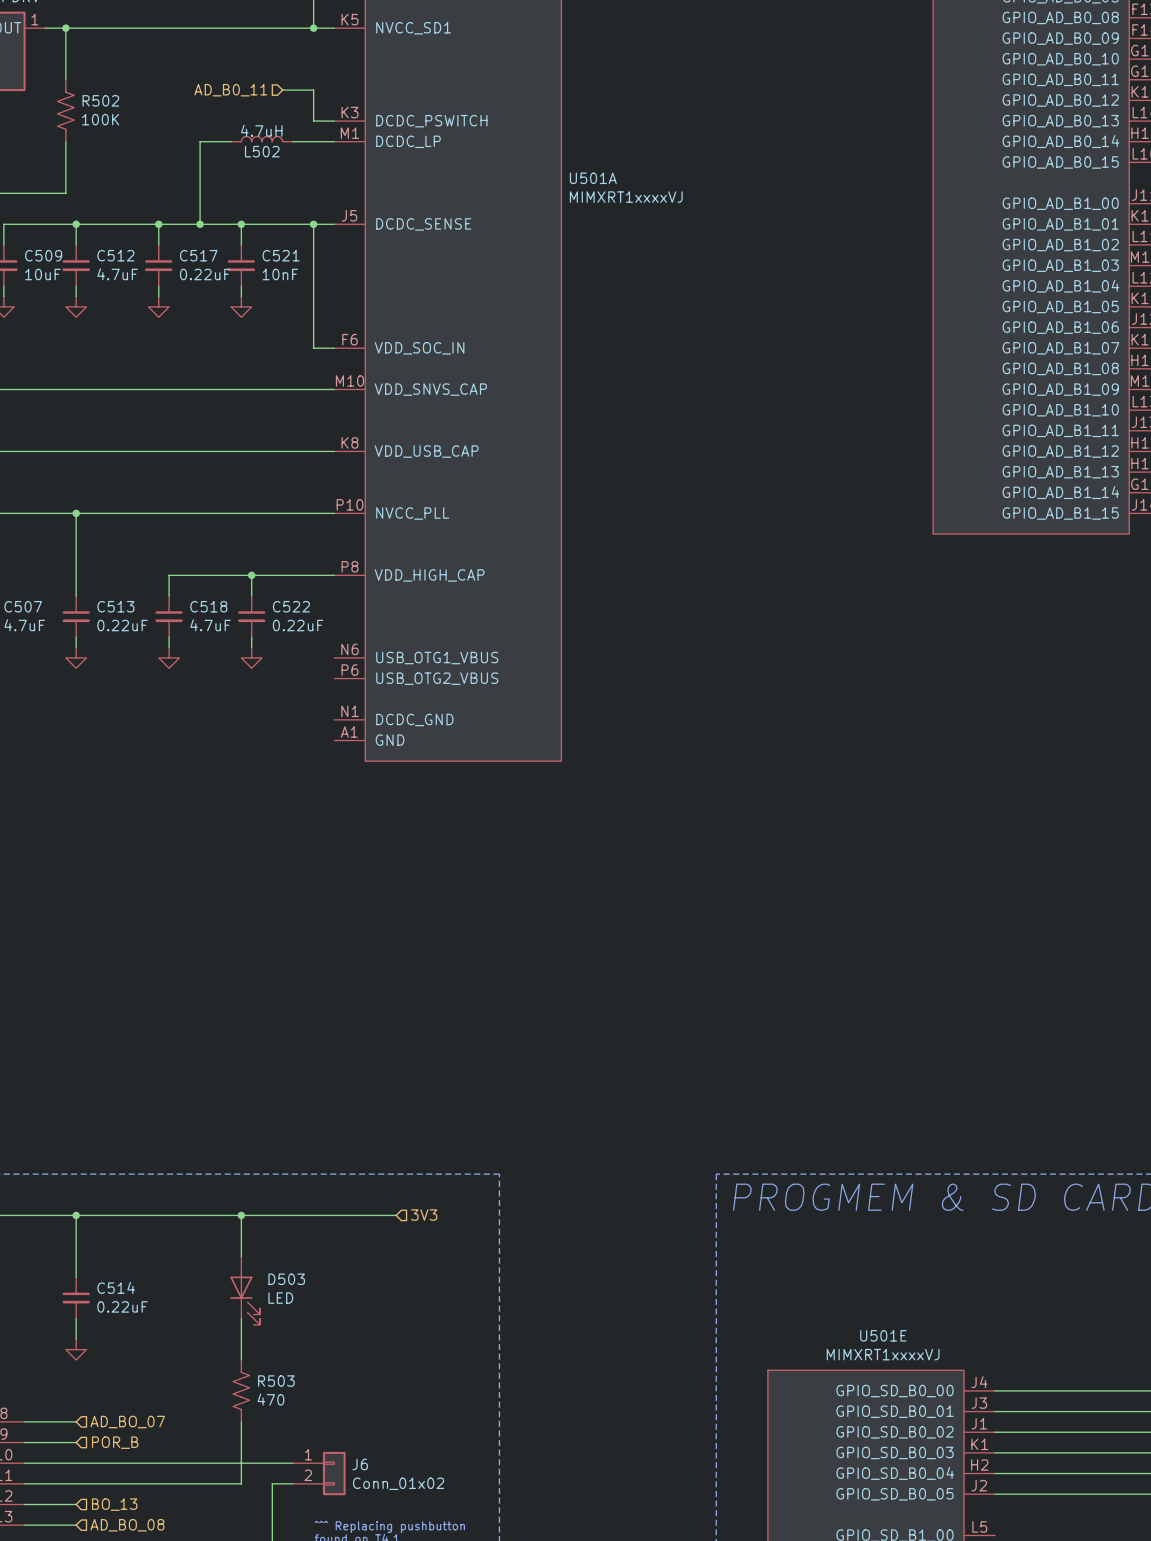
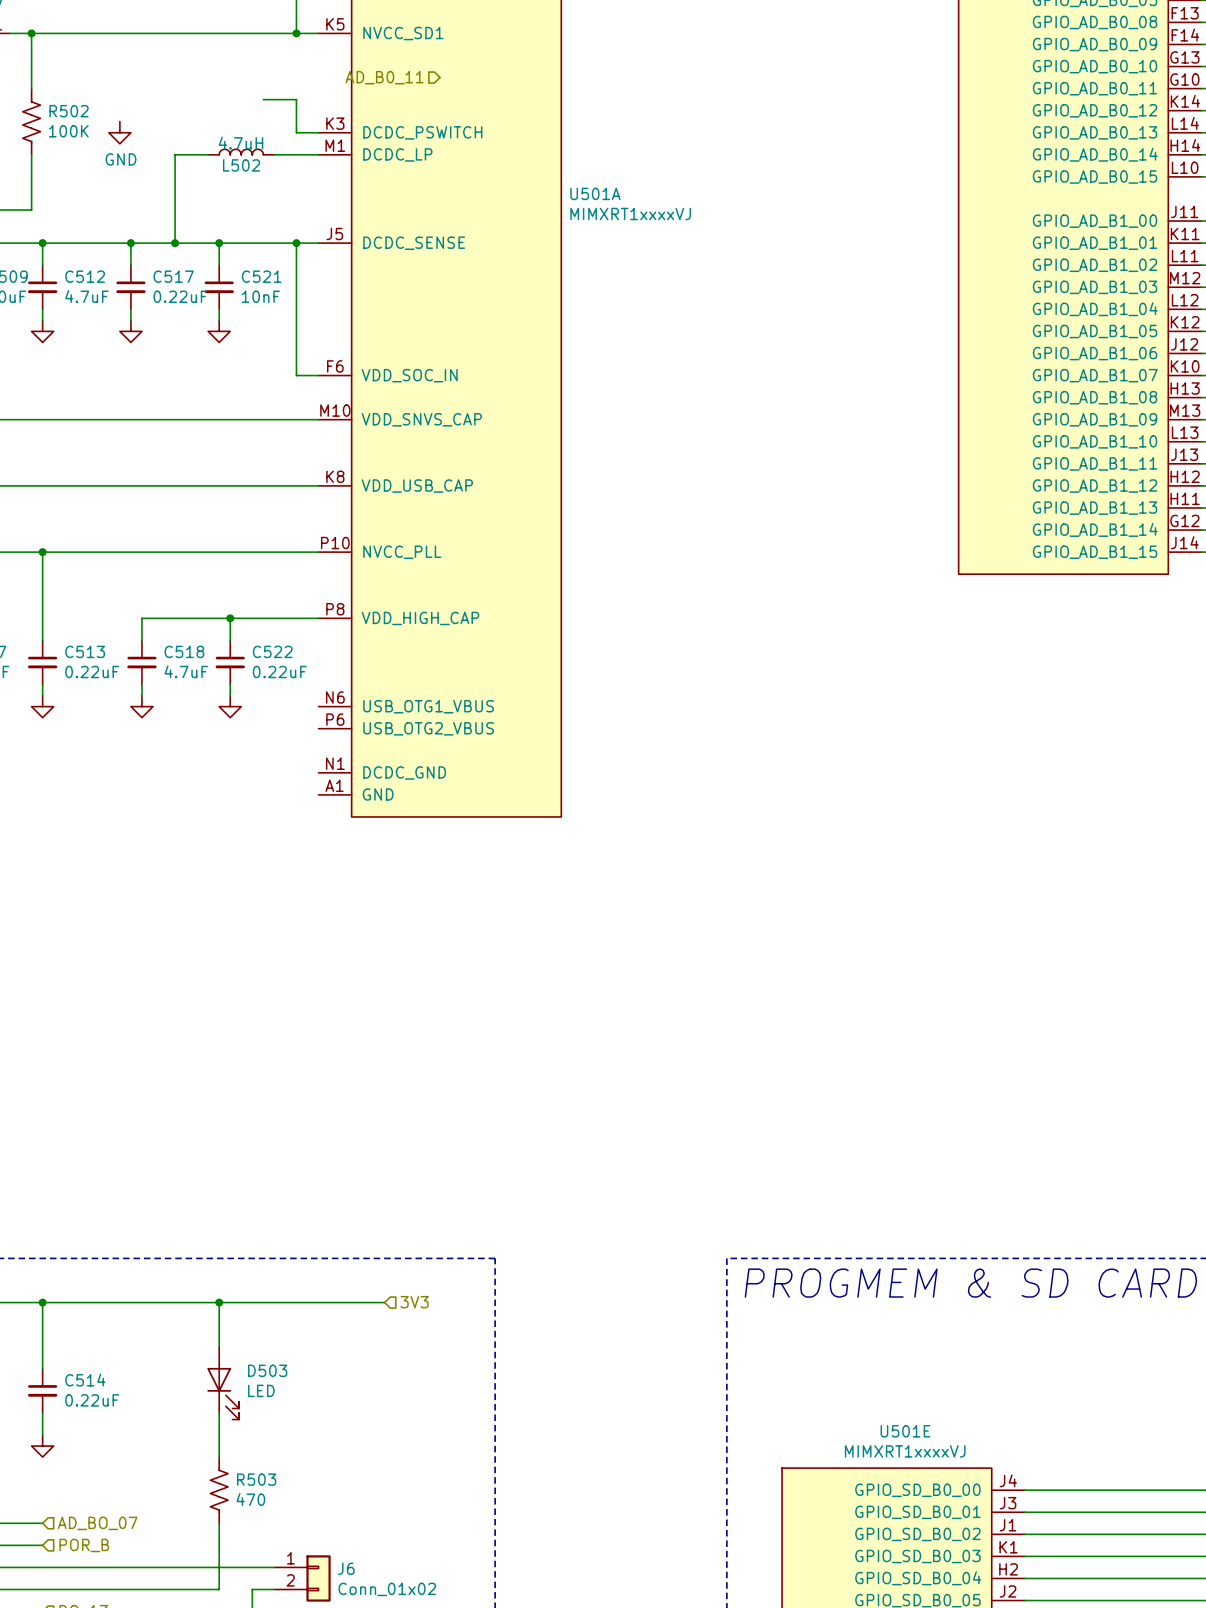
hierarchical label position: AD_B0_11 (230, 90) -> AD_B0_11 (384, 77)
power symbol: none -> GND (119, 132)

